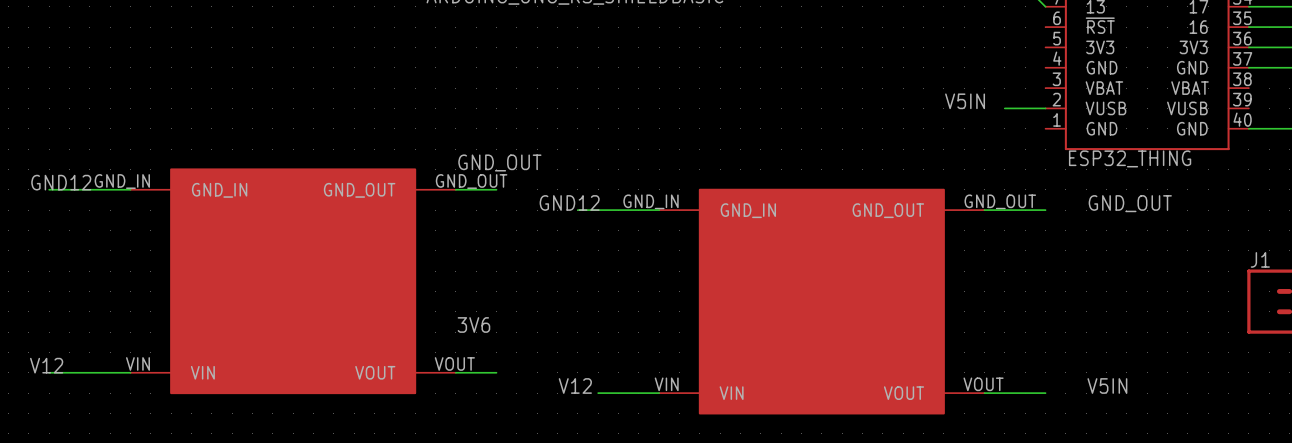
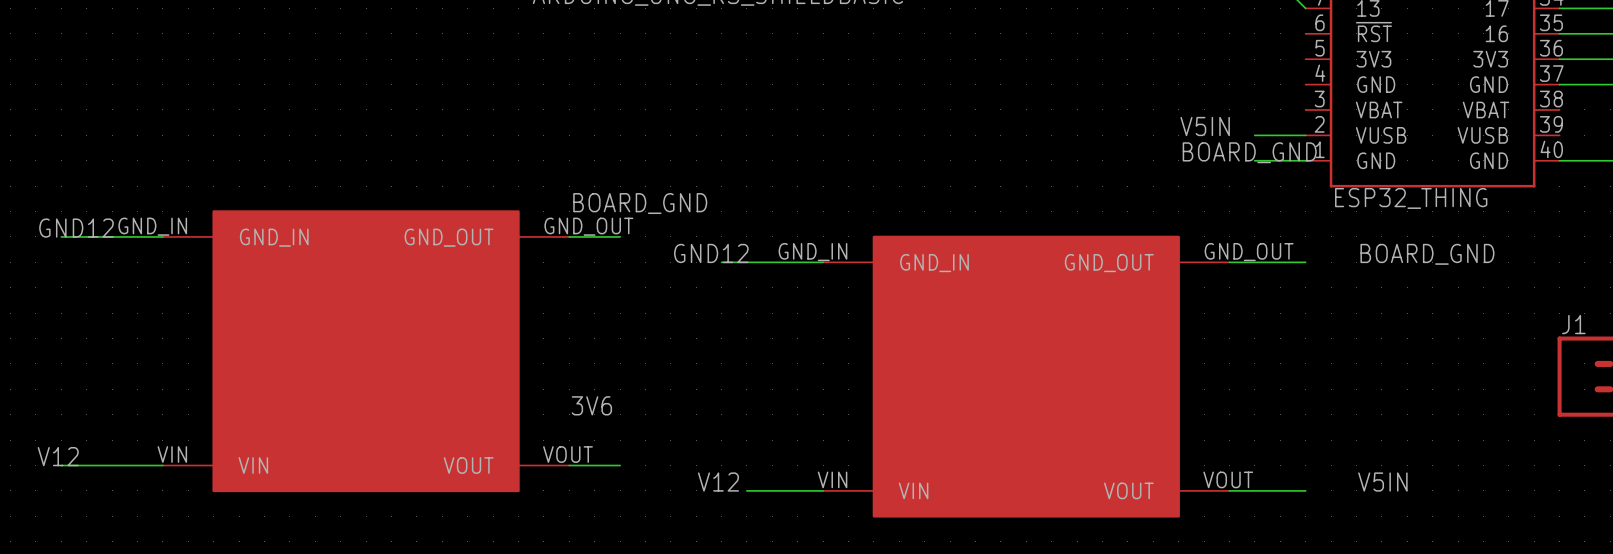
label: none -> BOARD_GND (1249, 152)
wire: none -> (1254, 160) (1305, 160)
label: GND_OUT (499, 162) -> BOARD_GND (640, 203)
label: GND_OUT (1130, 203) -> BOARD_GND (1427, 254)

